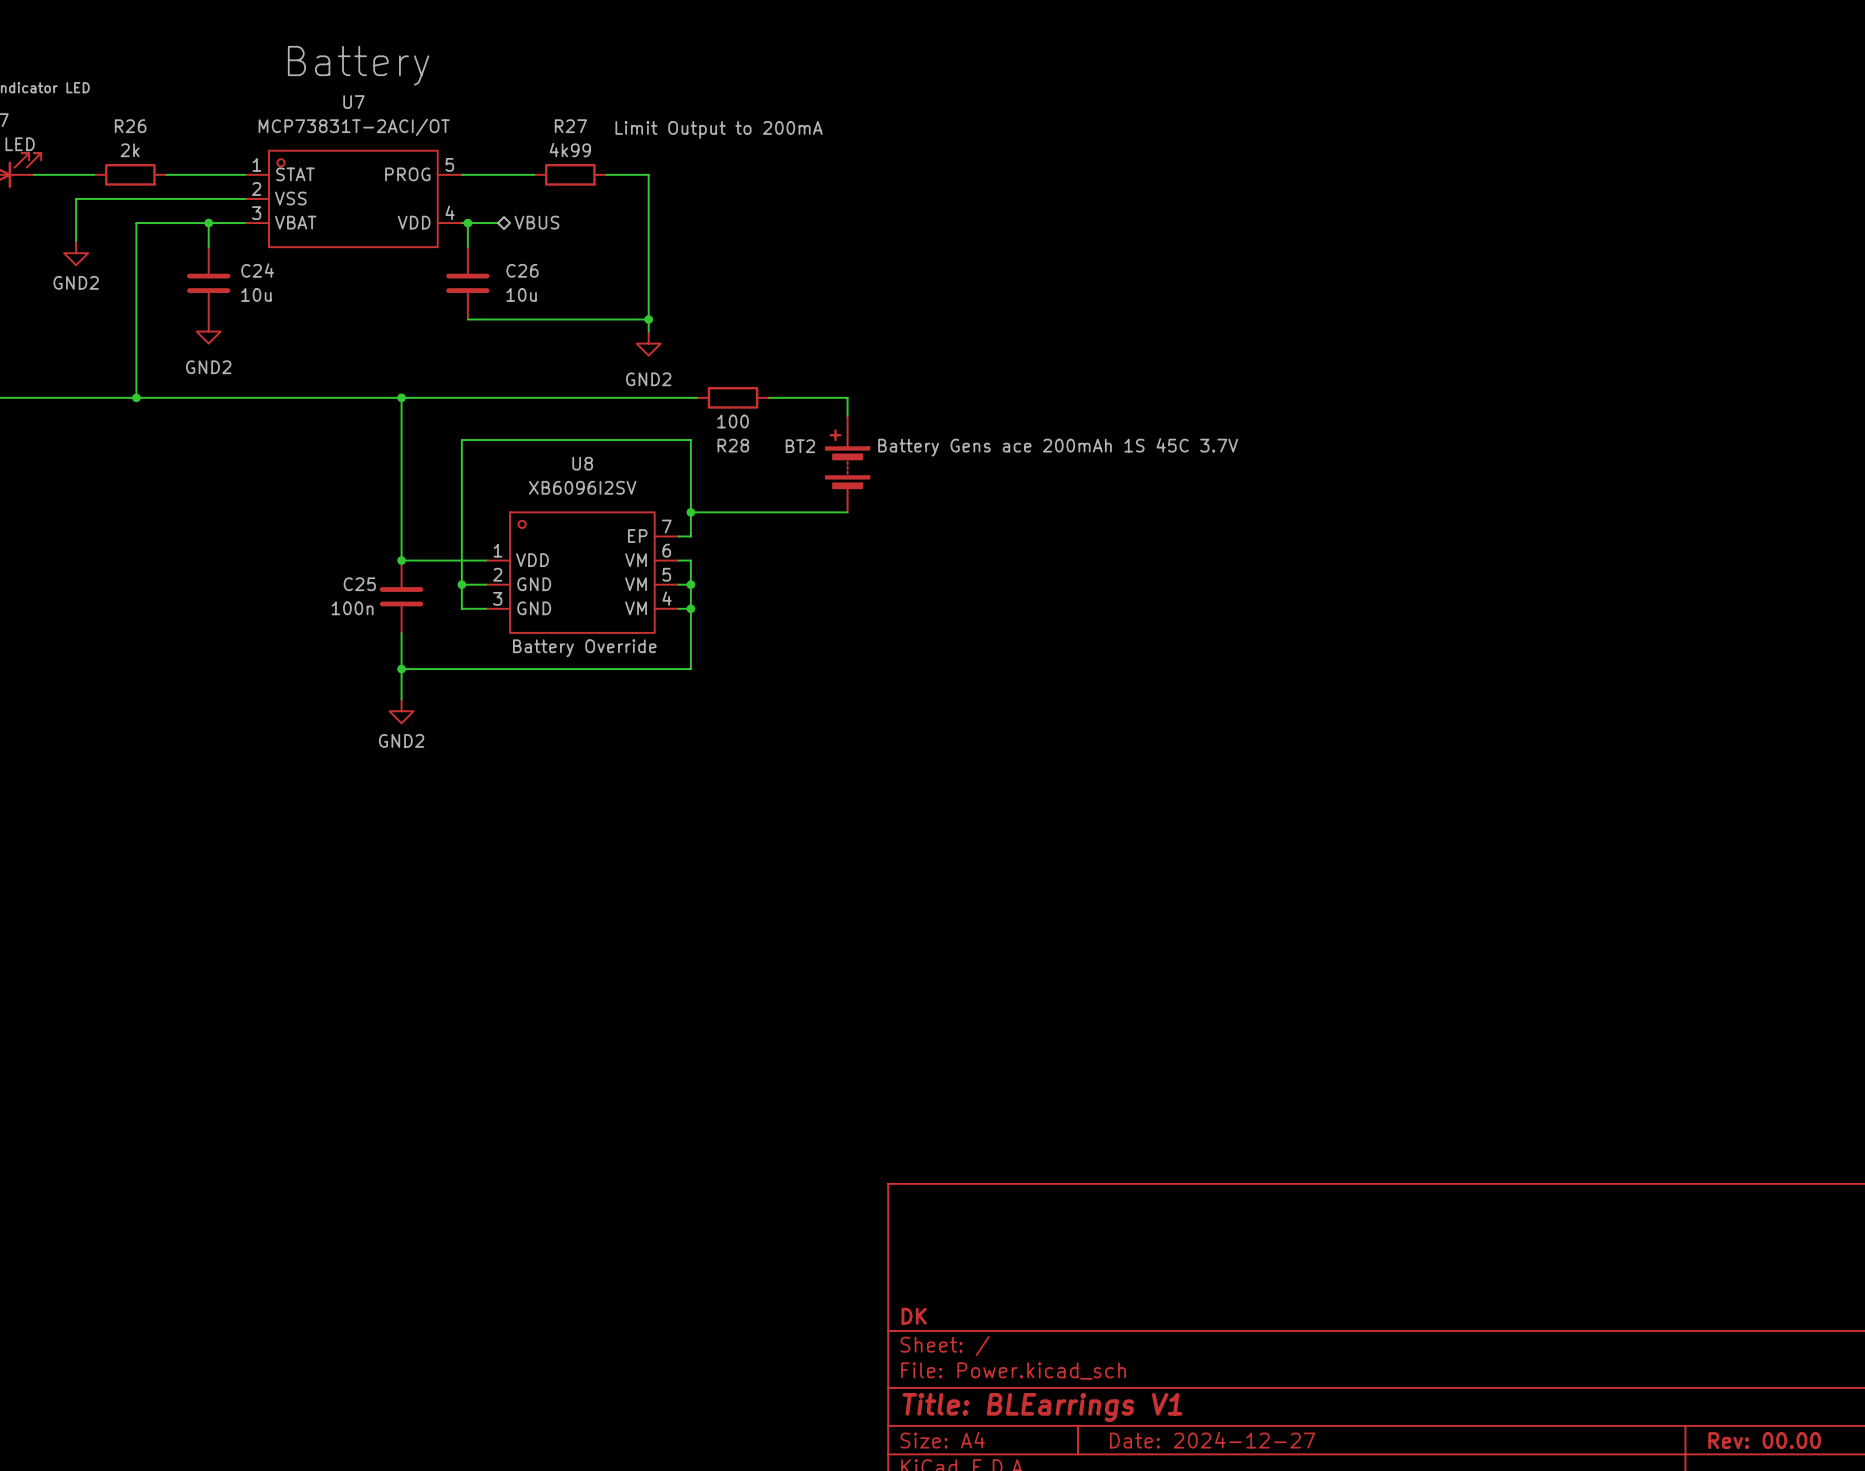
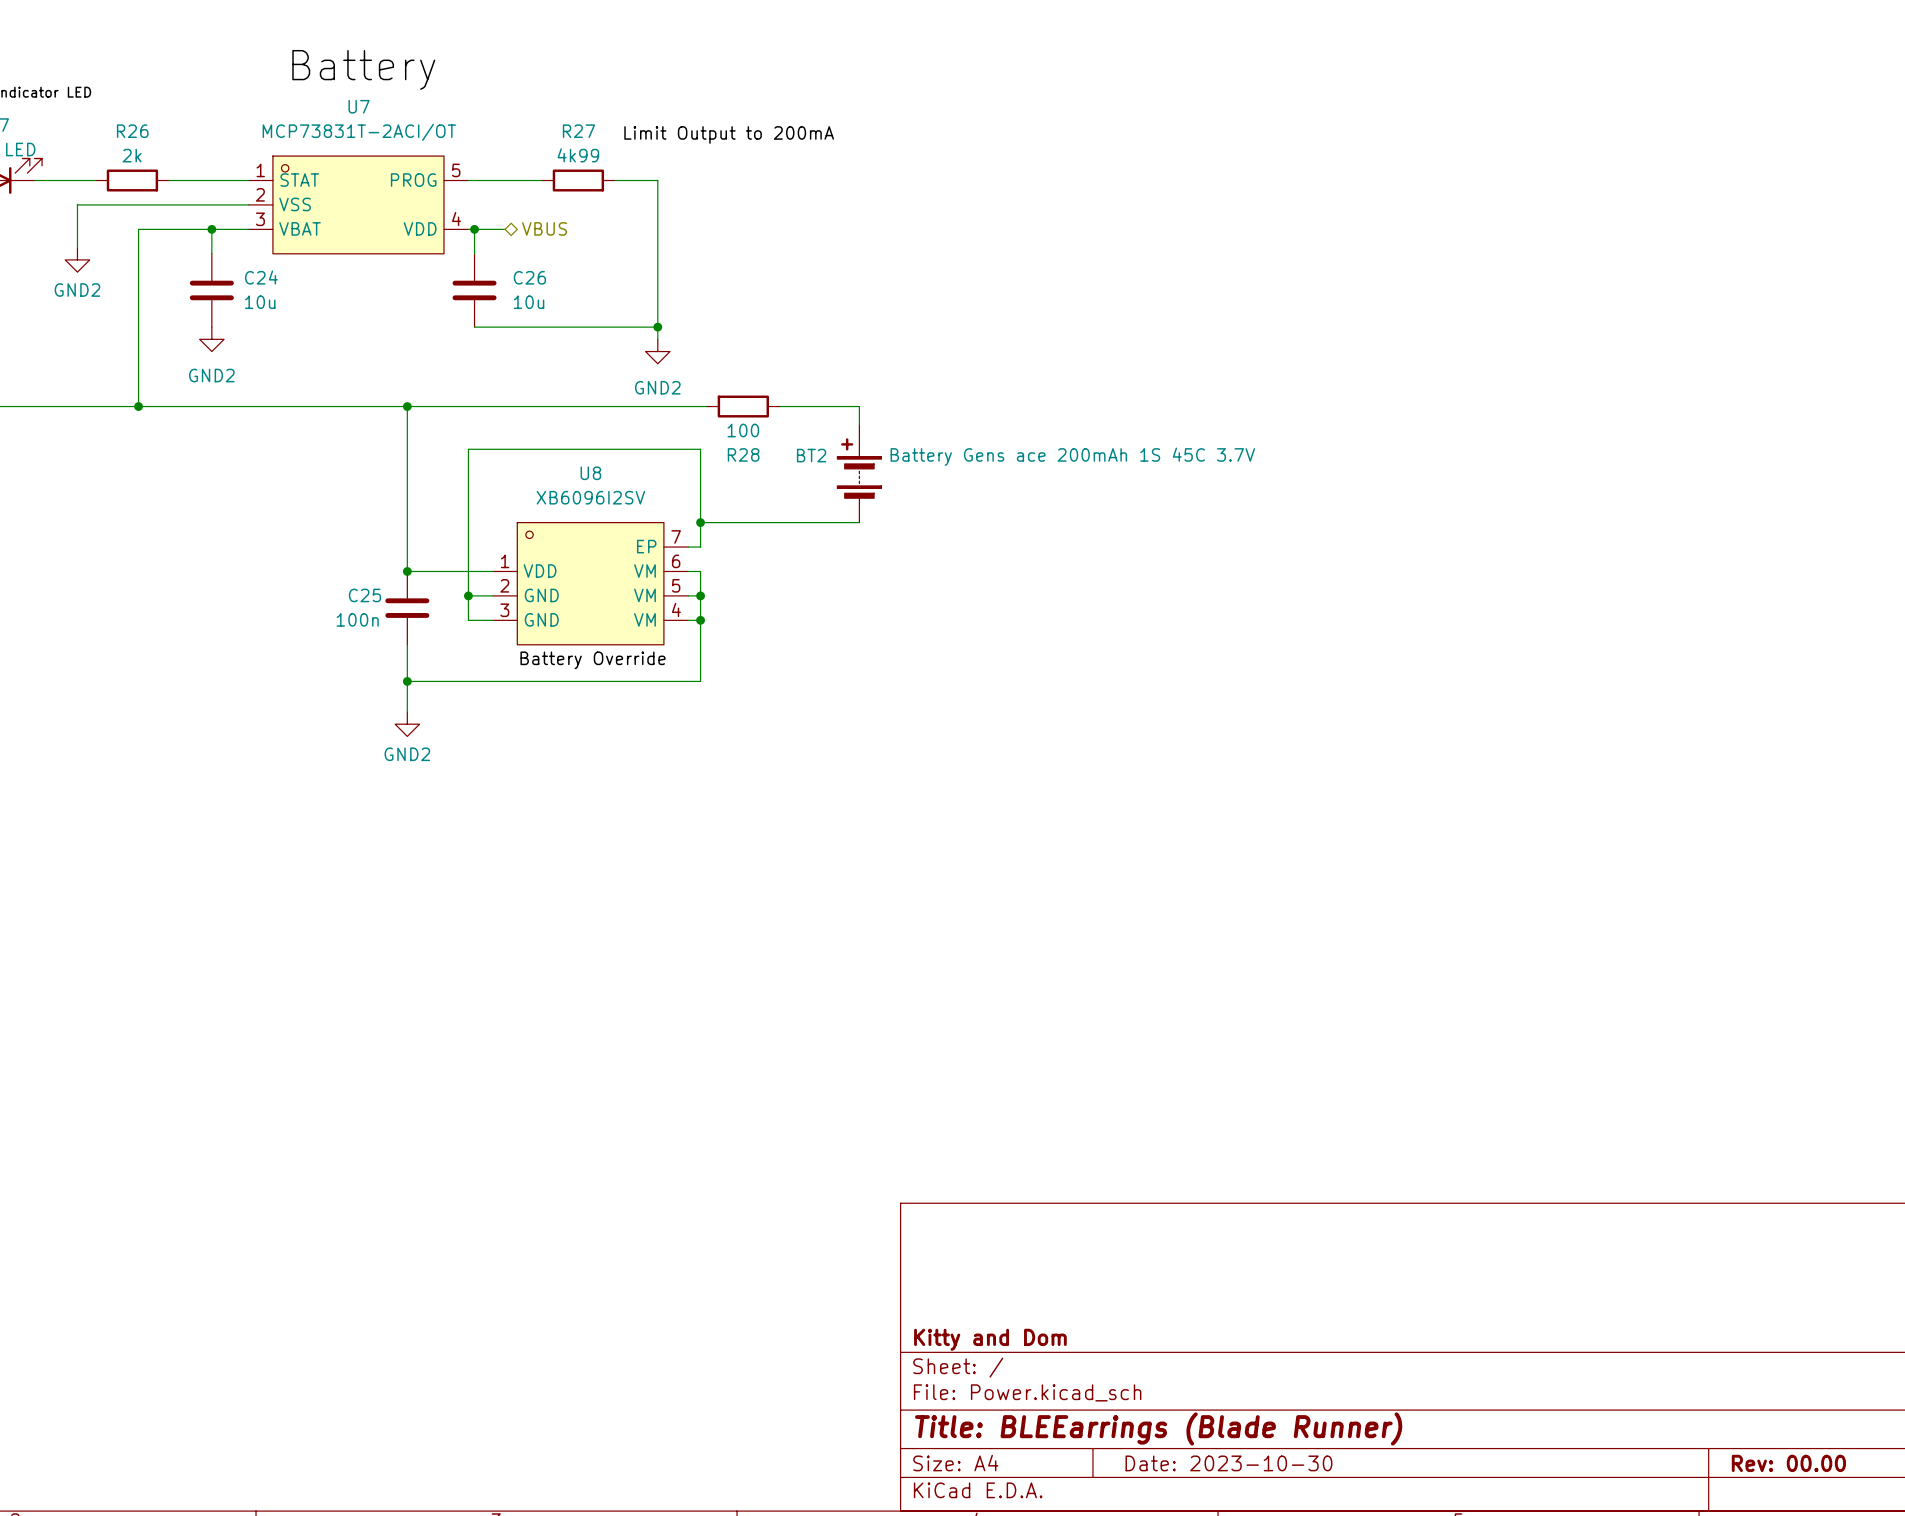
title block: DK (914, 1316) -> Kitty and Dom (990, 1339)
title block: Title: BLEarrings V1 (1042, 1407) -> Title: BLEEarrings (Blade Runner) (1158, 1428)
title block: Date: 2024-12-27 (1212, 1440) -> Date: 2023-10-30 (1228, 1463)

